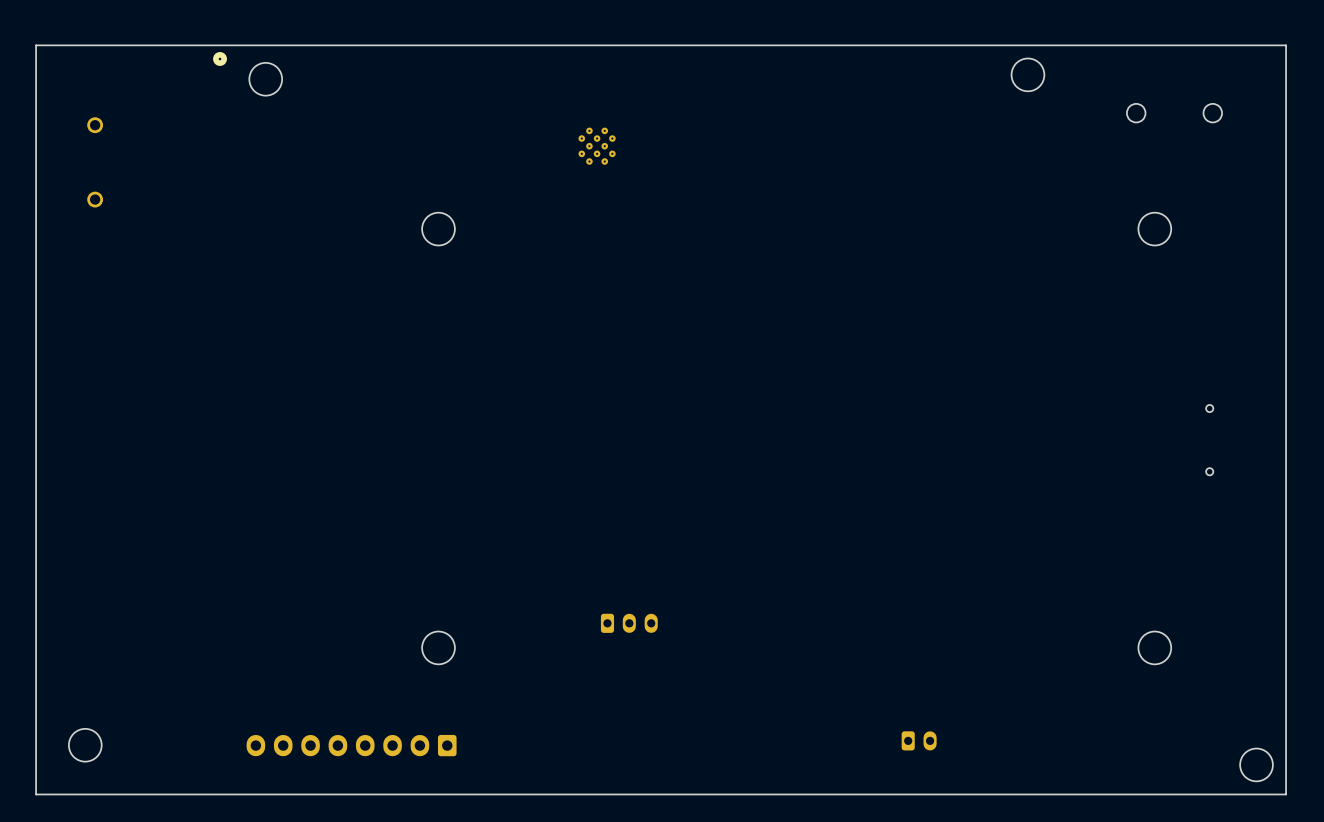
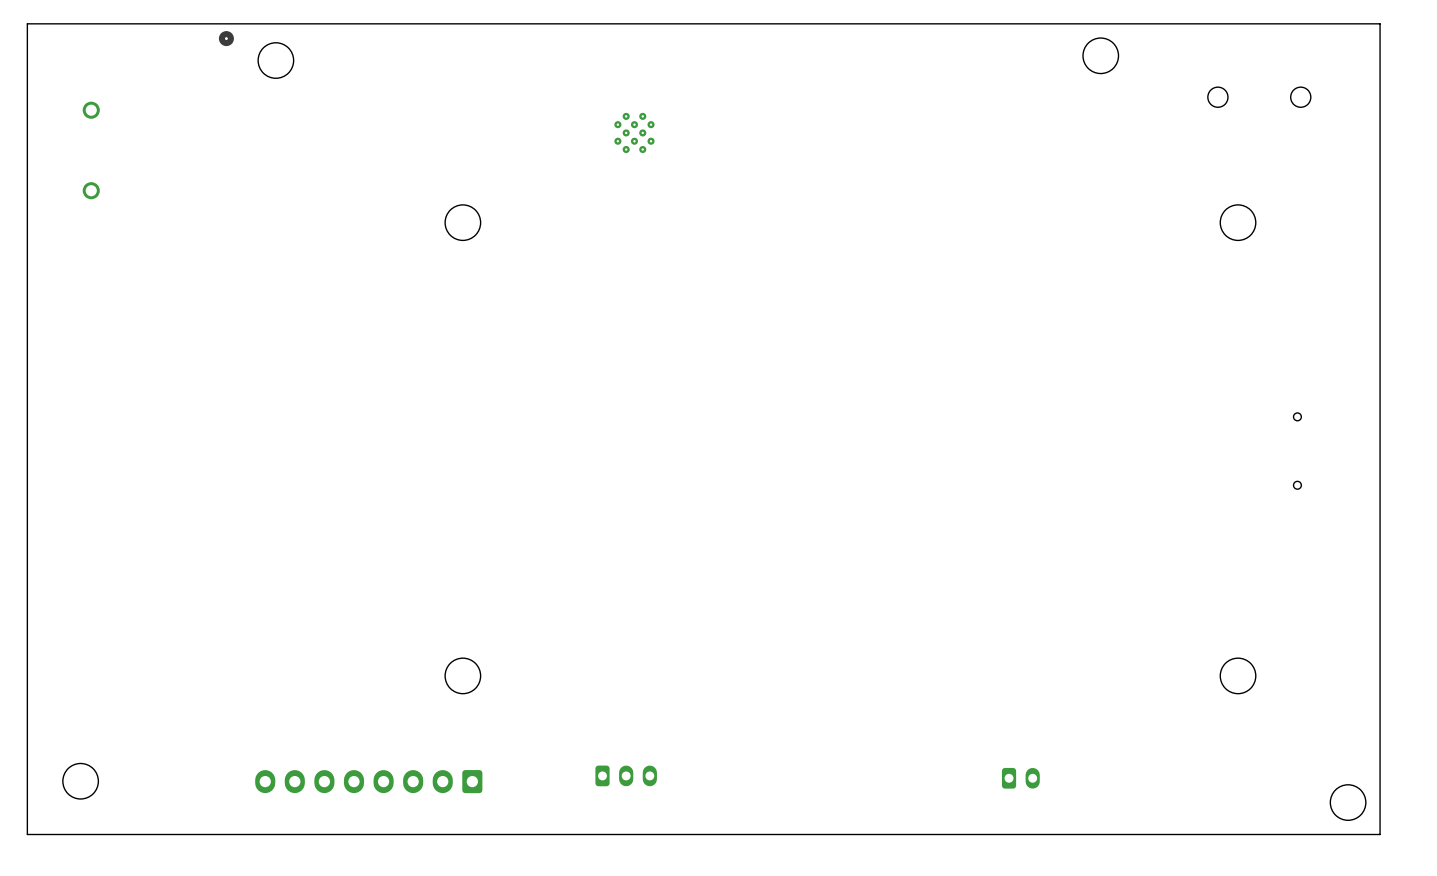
part position: (629, 623) -> (626, 775)
part position: (919, 740) -> (1020, 778)

